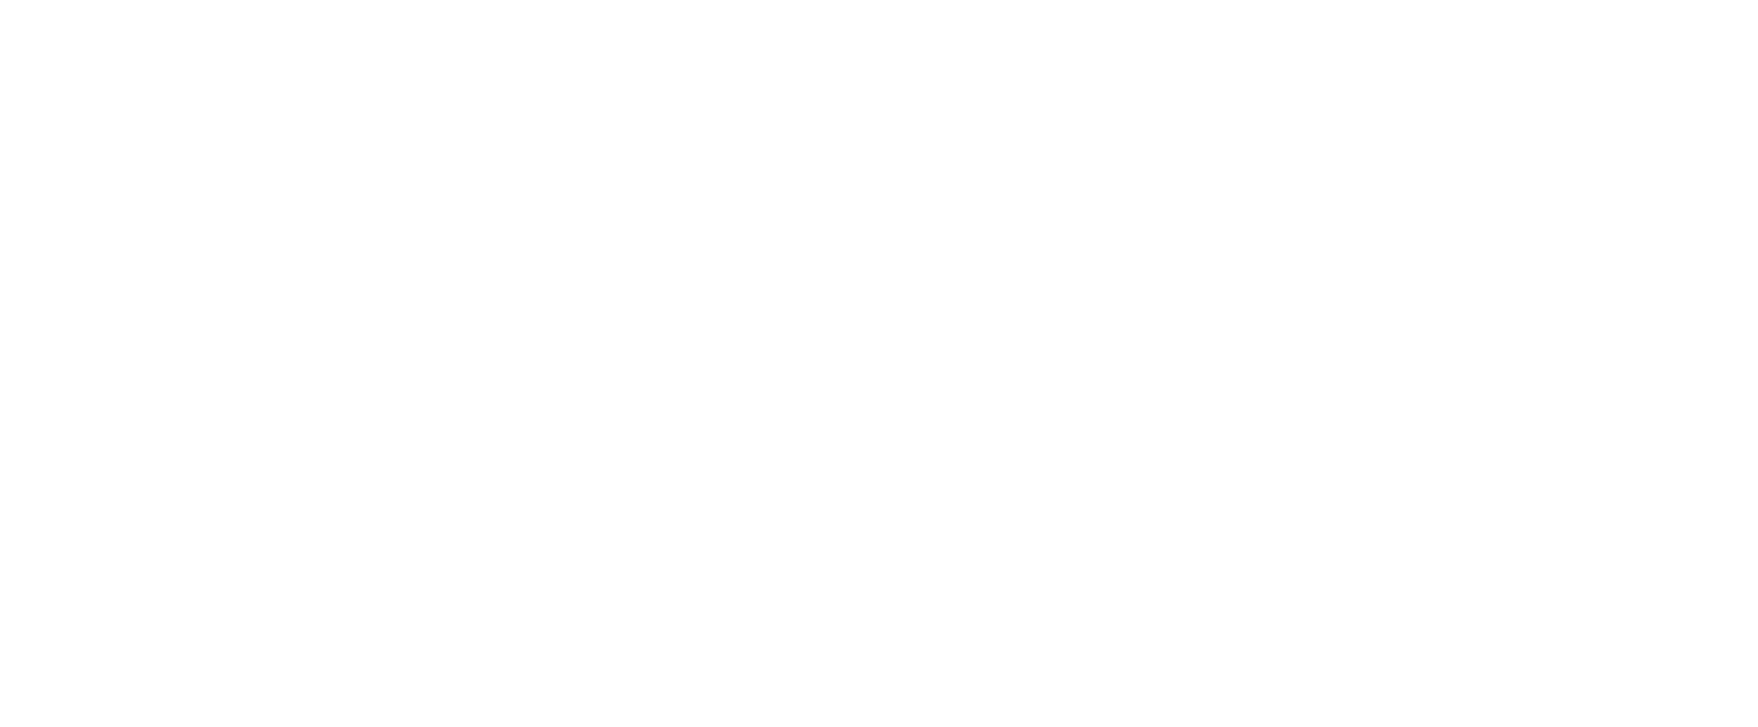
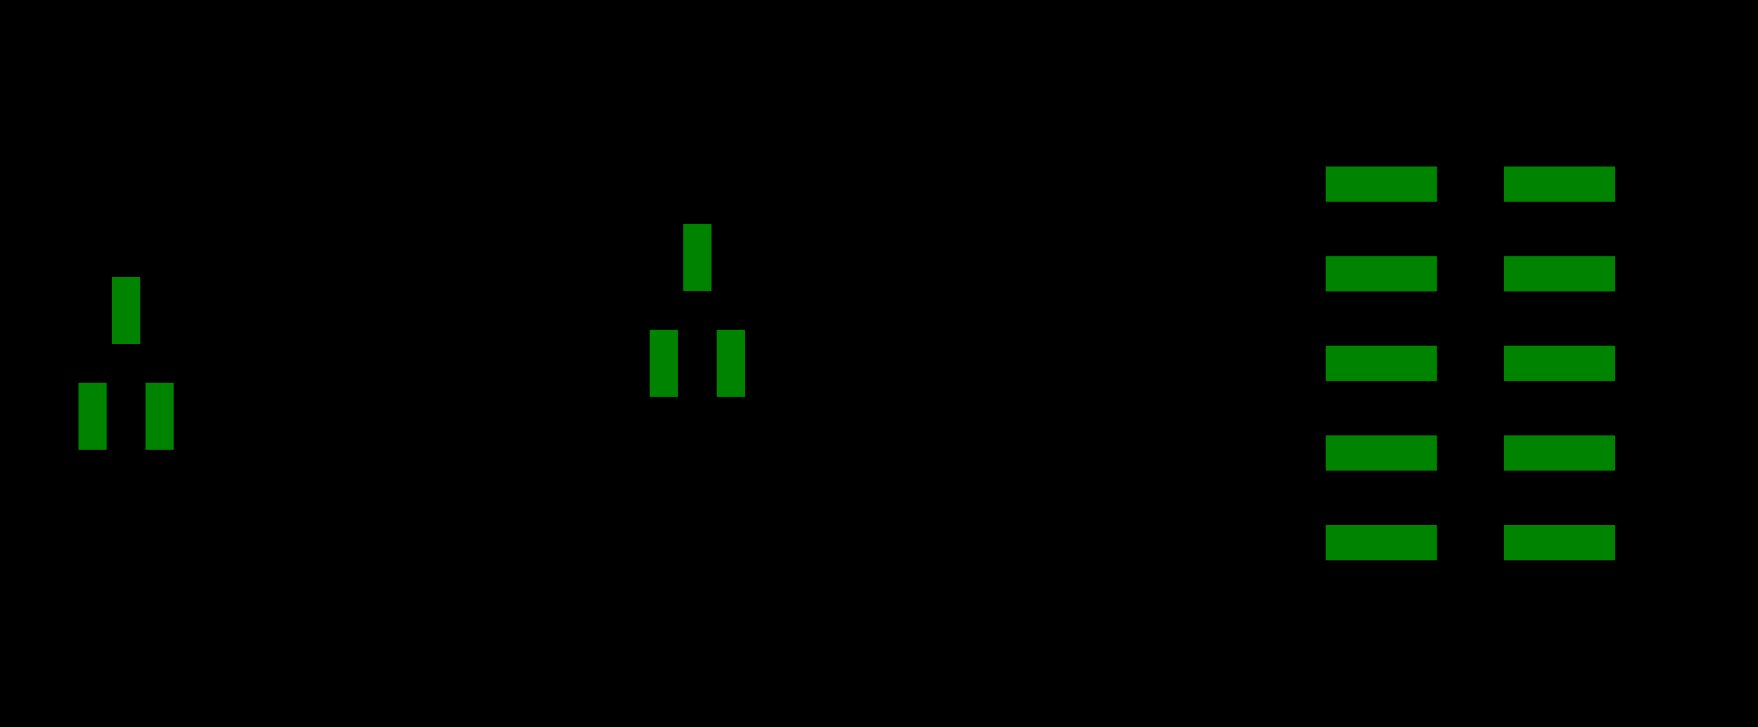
part: none -> (697, 310)
part: none -> (126, 363)
part: none -> (1470, 363)

